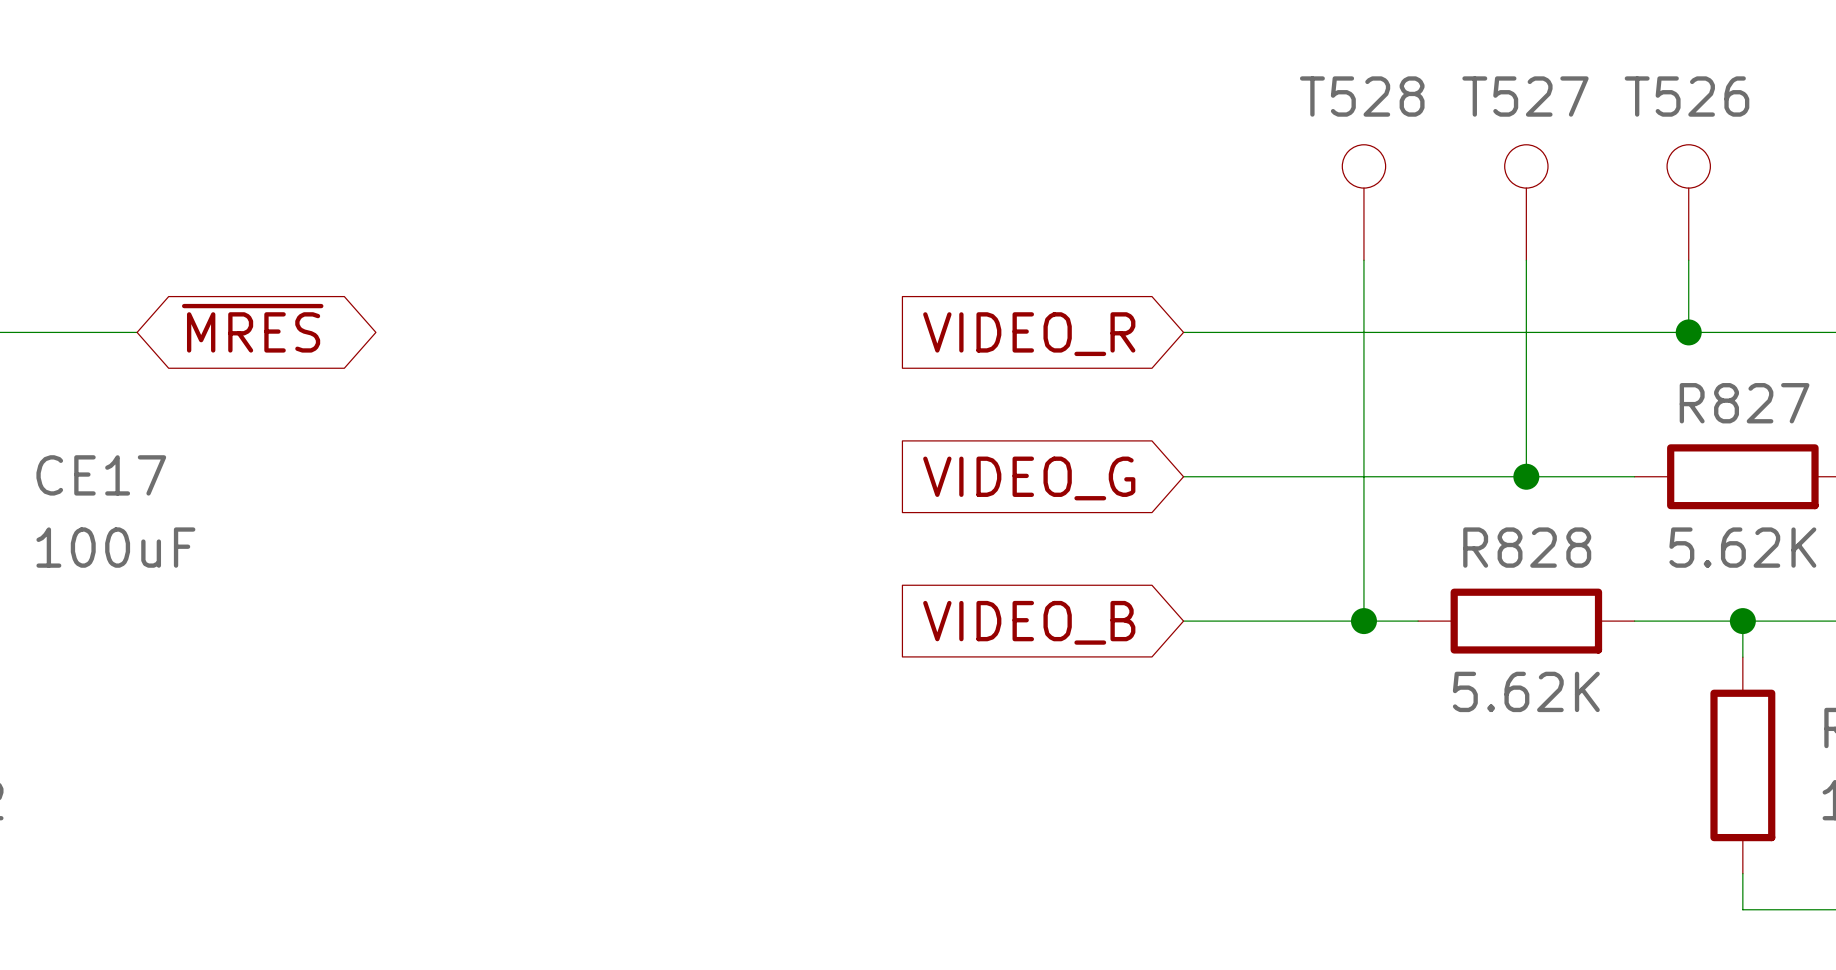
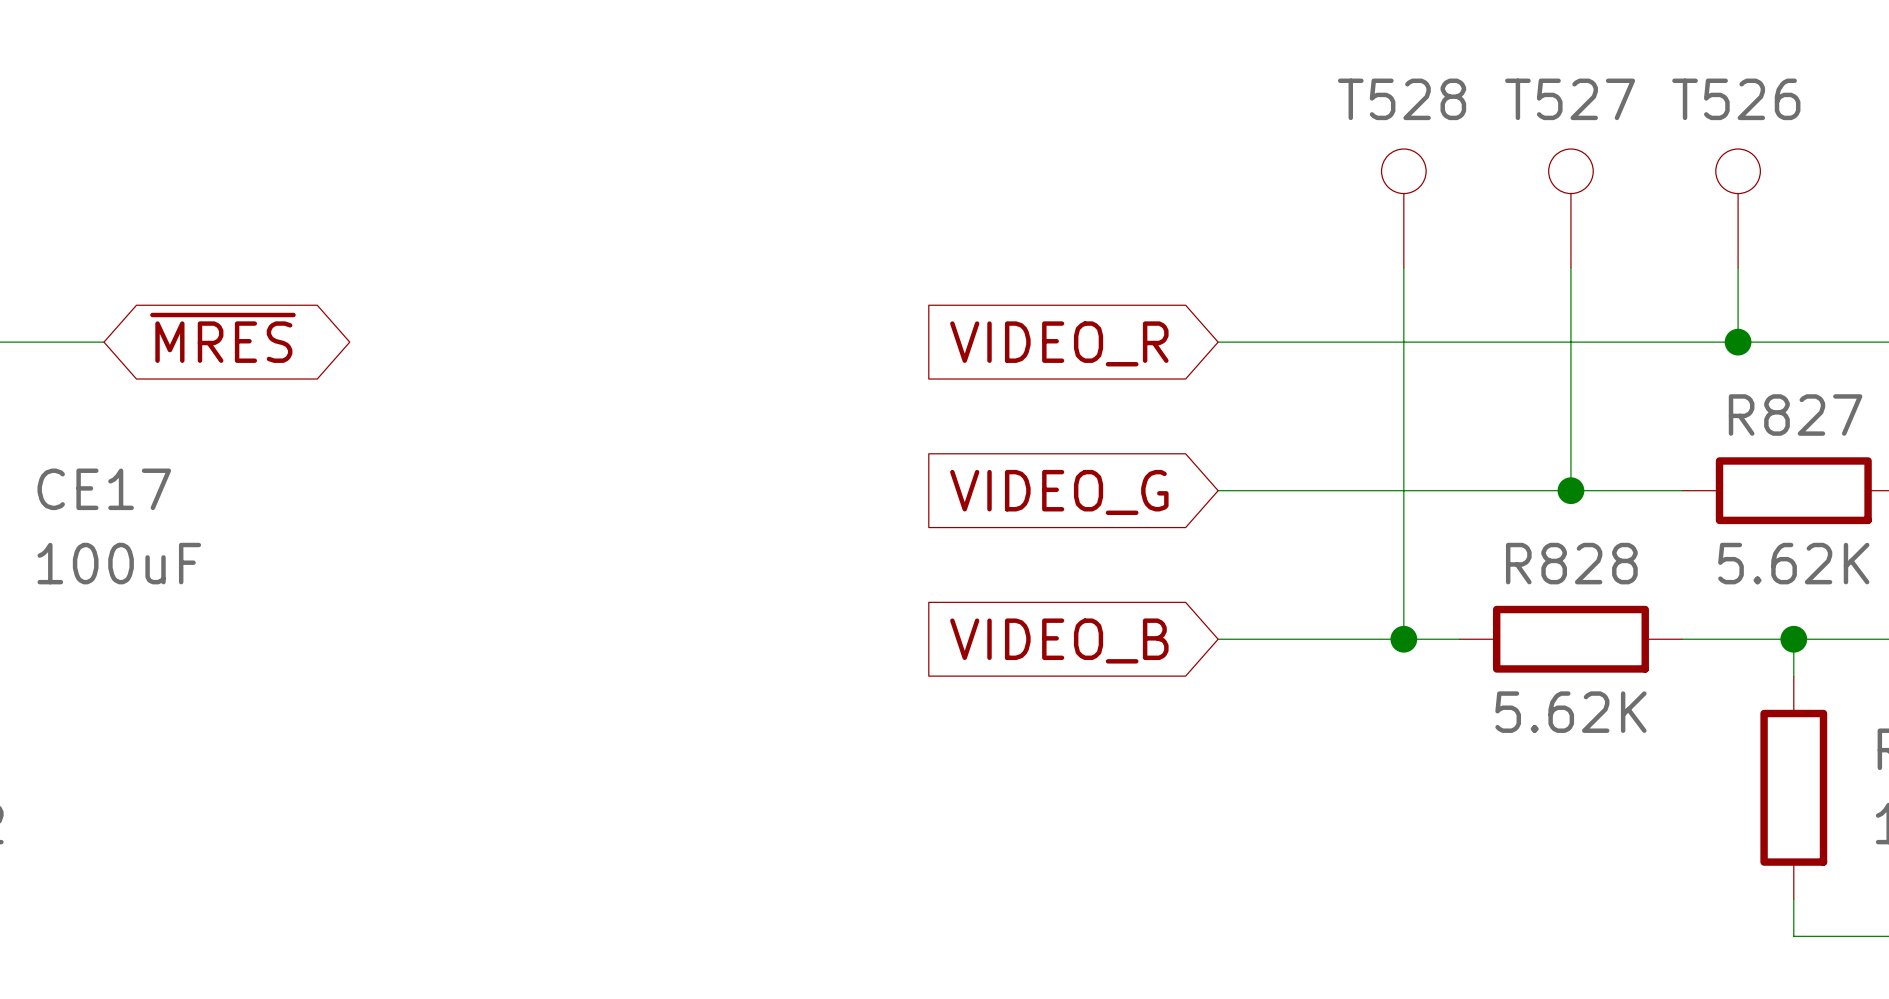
global label position: ~{MRES} (252, 328) -> ~{MRES} (222, 337)
wire: (101, 332) (137, 332) -> none

